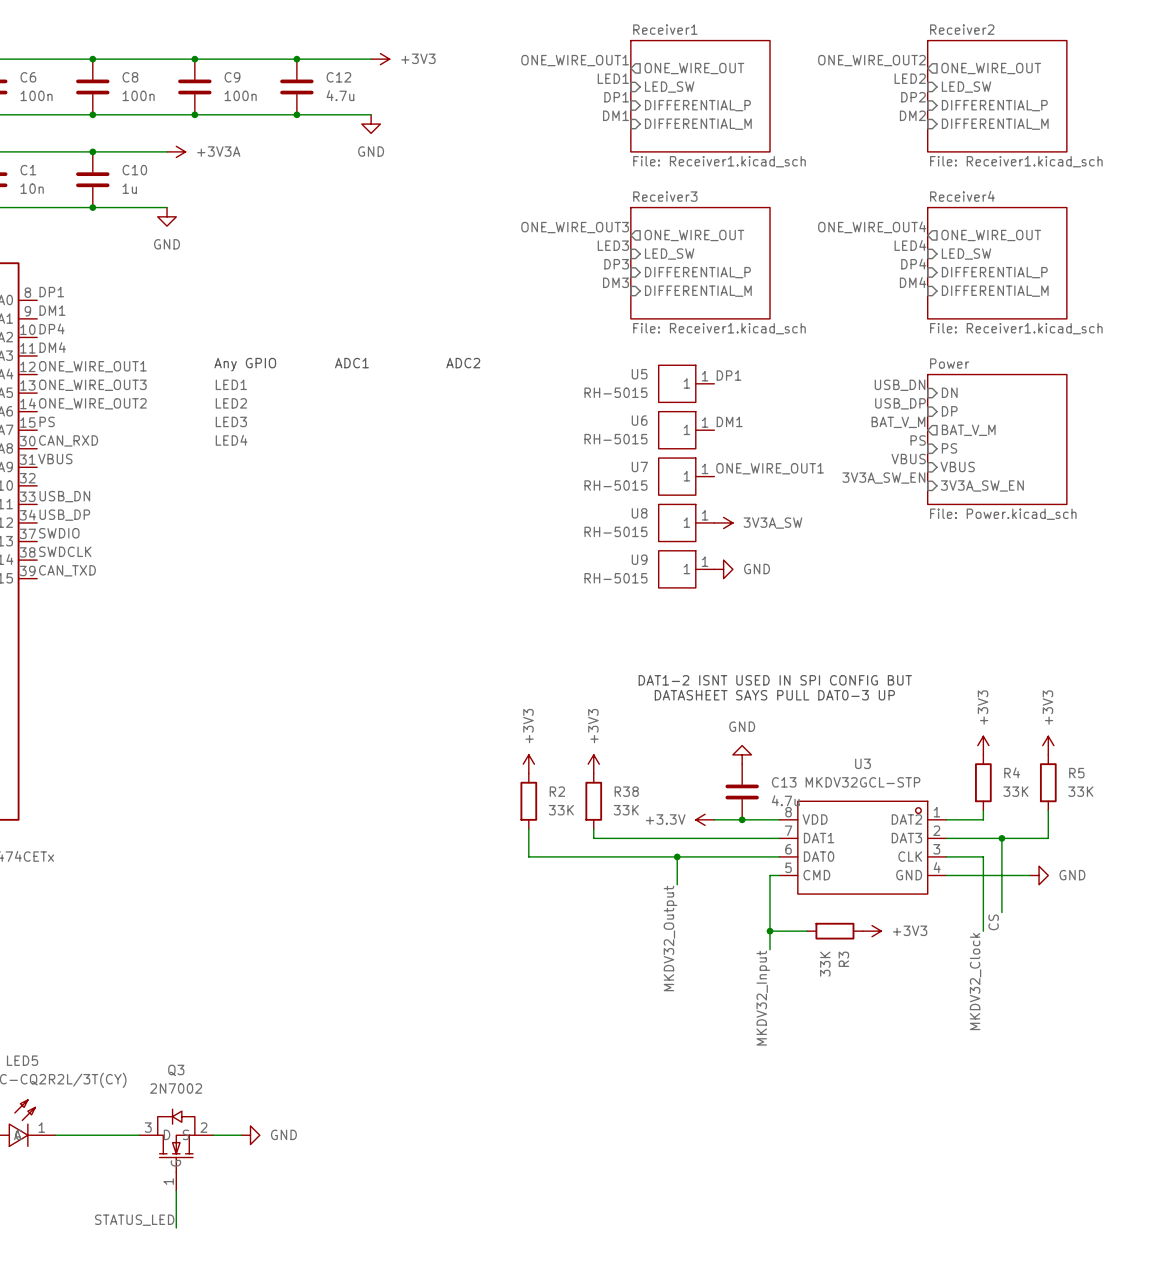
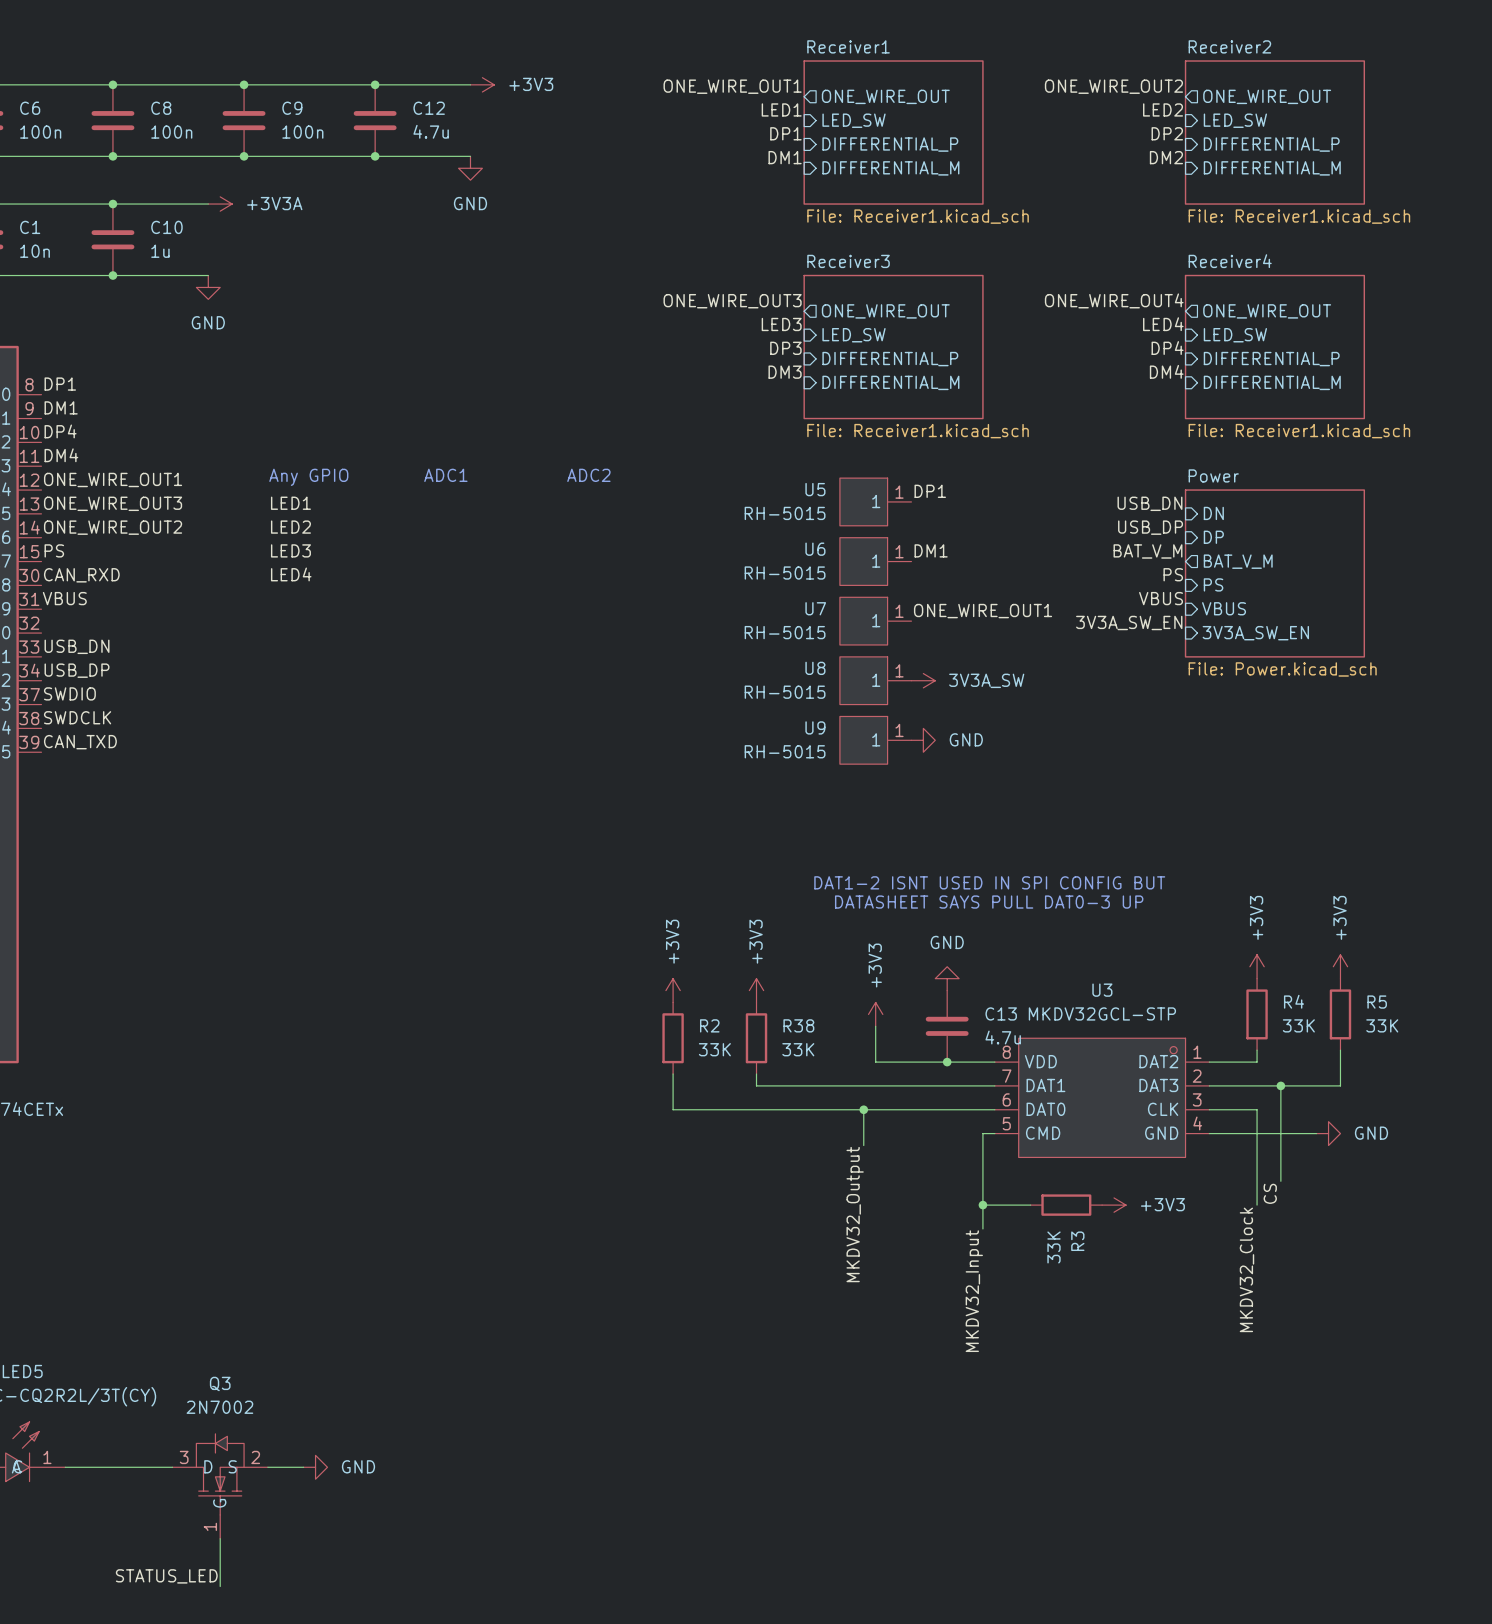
power symbol: none -> +3V3 (875, 1014)
wire: none -> (875, 1026) (875, 1062) (911, 1062)
power symbol: +3.3V (705, 819) -> none

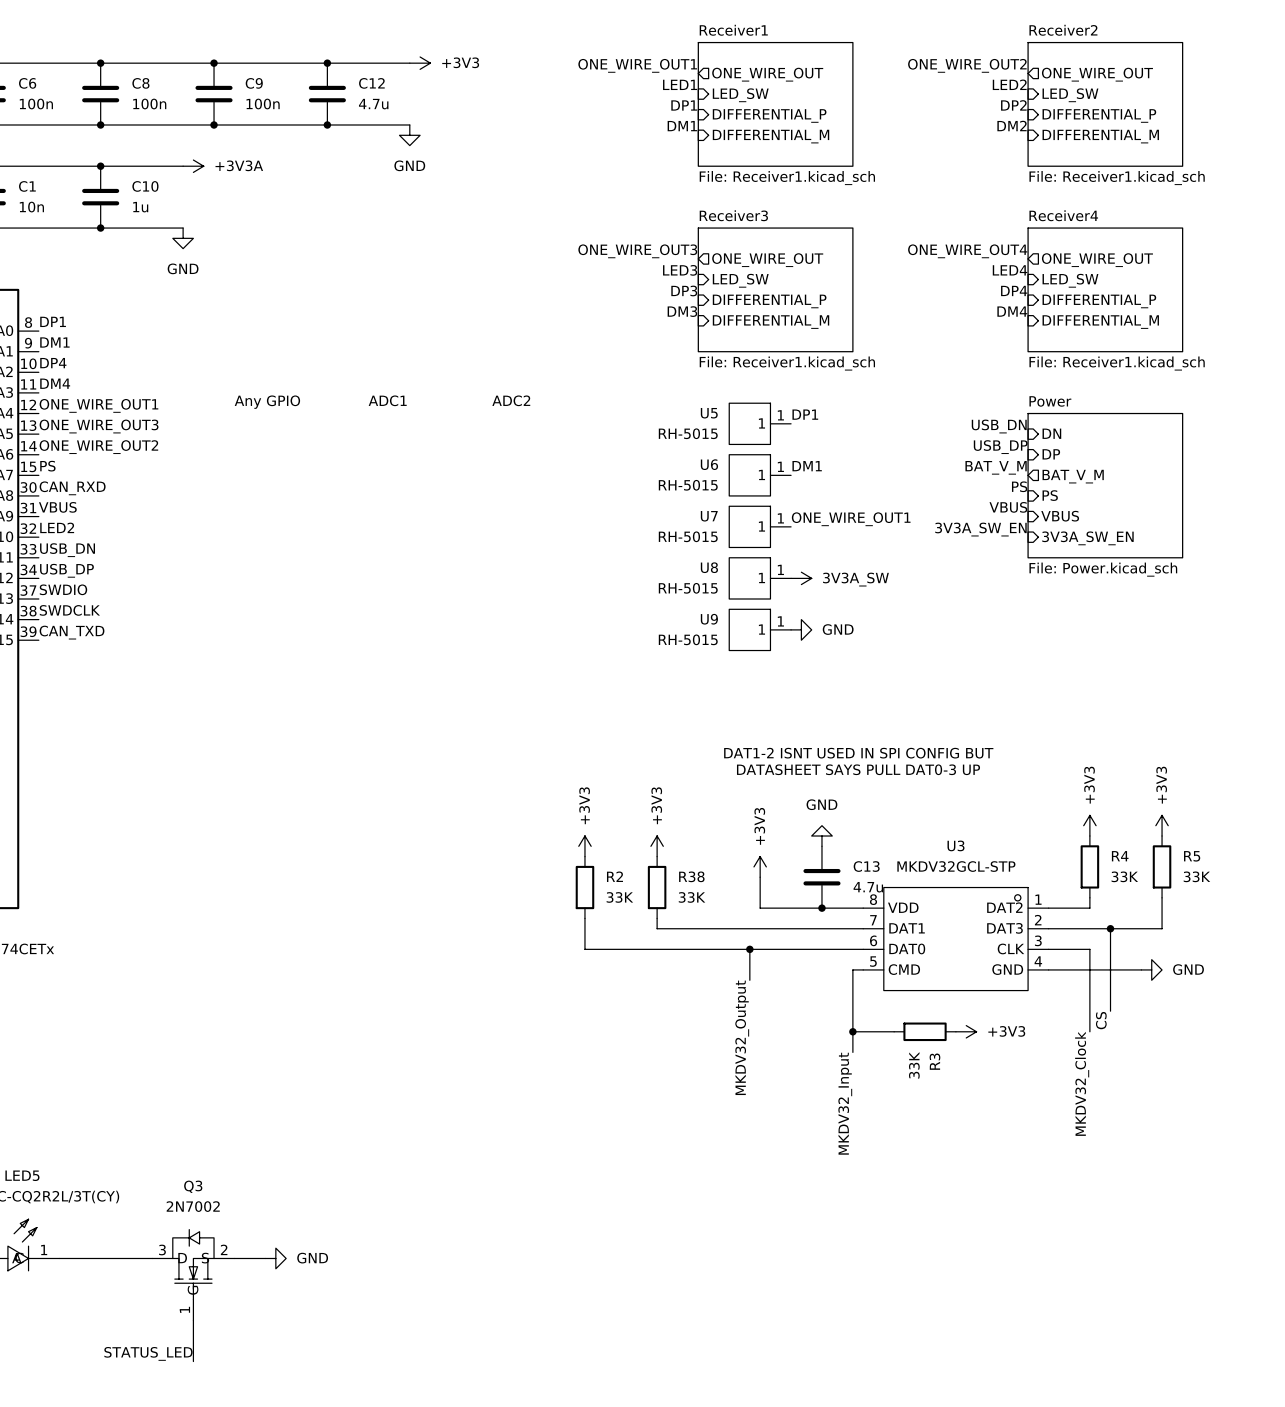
label: LED1 (290, 503) -> none
label: LED2 (290, 527) -> none
label: LED3 (290, 550) -> none
label: LED4 (291, 574) -> none
label: none -> LED2 (57, 527)

